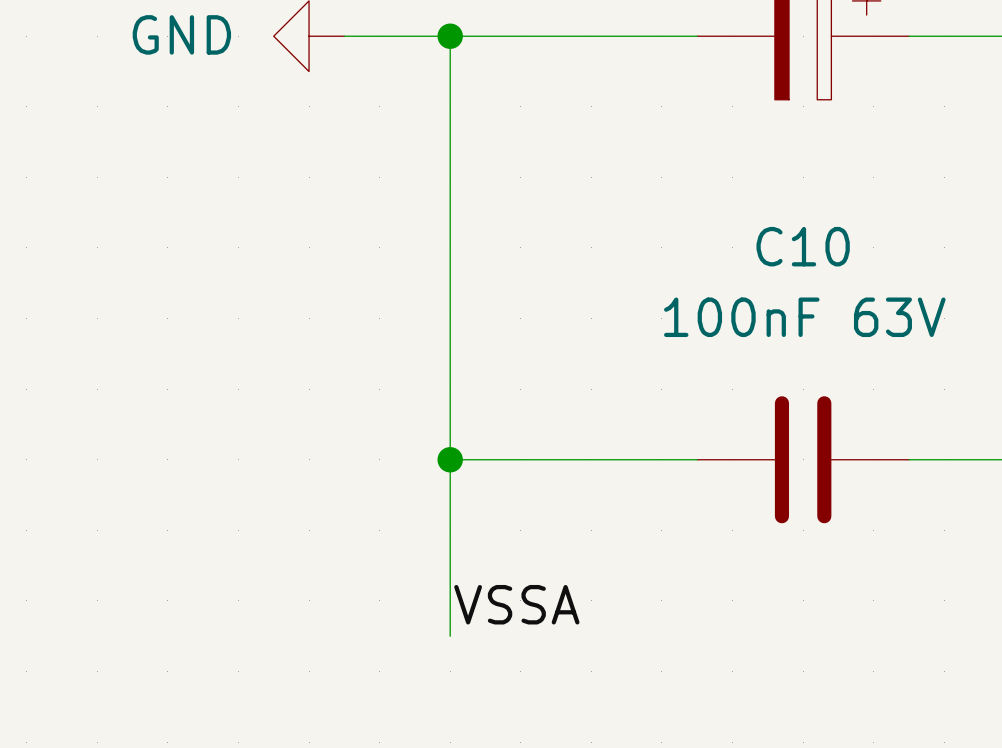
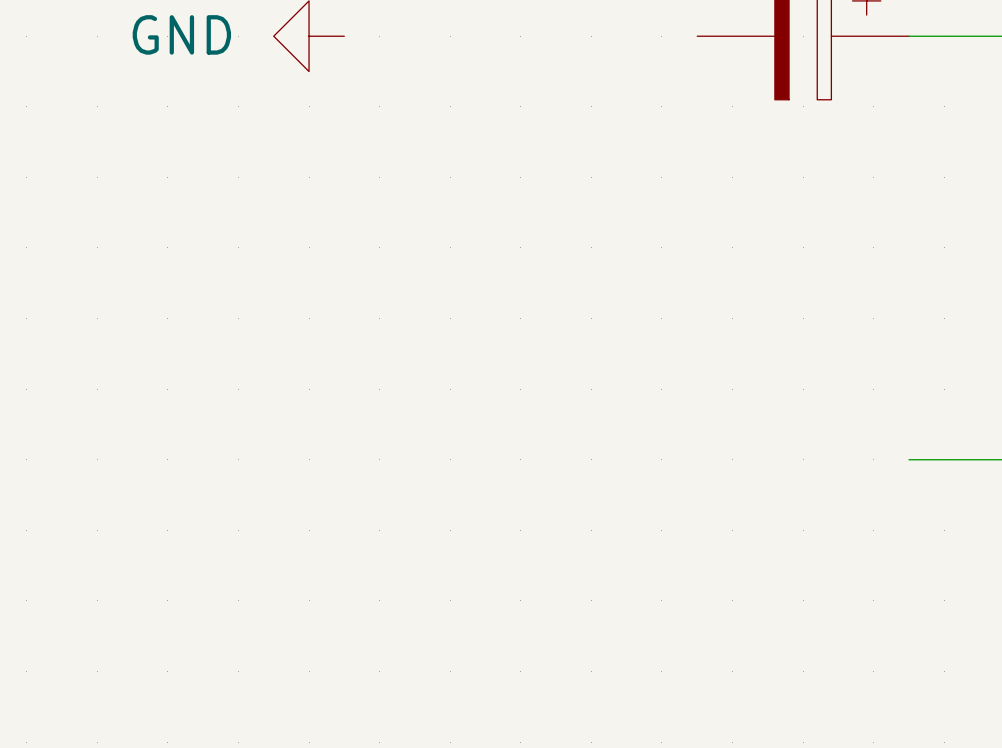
wire: (344, 36) (697, 36) -> none
wire: (450, 36) (450, 636) -> none
junction: (450, 36) -> none
wire: (450, 459) (697, 459) -> none
junction: (450, 459) -> none
C10: 100nF 63V (803, 459) -> none
label: VSSA (516, 604) -> none

